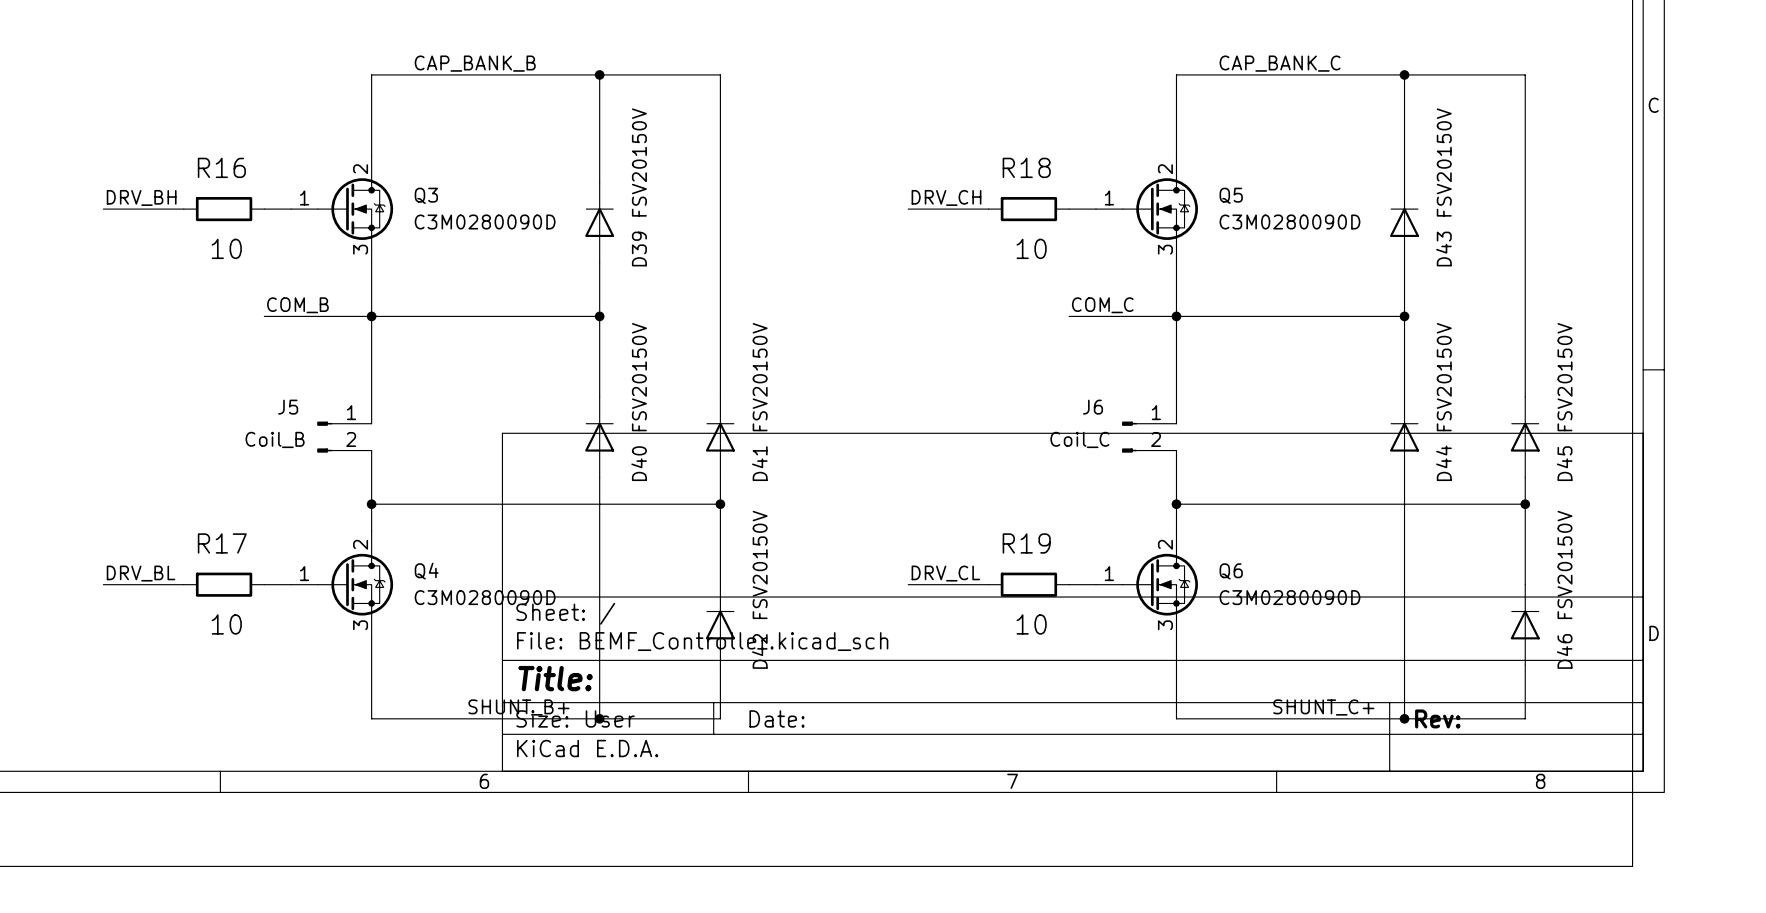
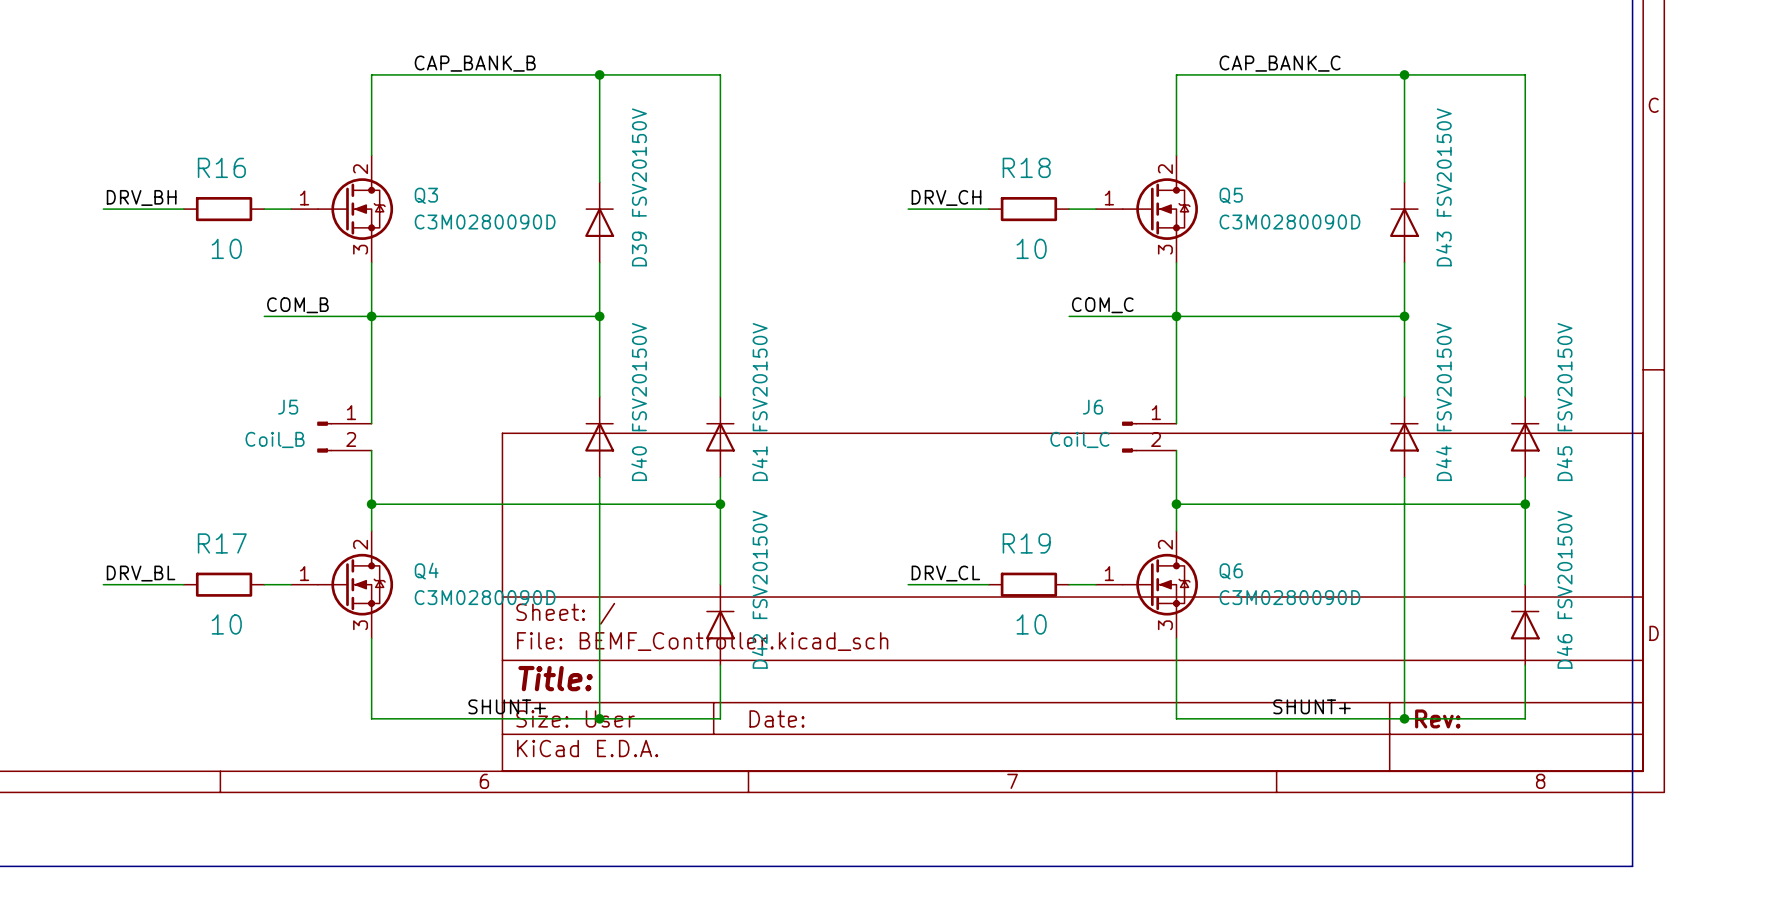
label: SHUNT_B+ (518, 707) -> SHUNT+ (507, 706)
label: SHUNT_C+ (1323, 707) -> SHUNT+ (1312, 706)

